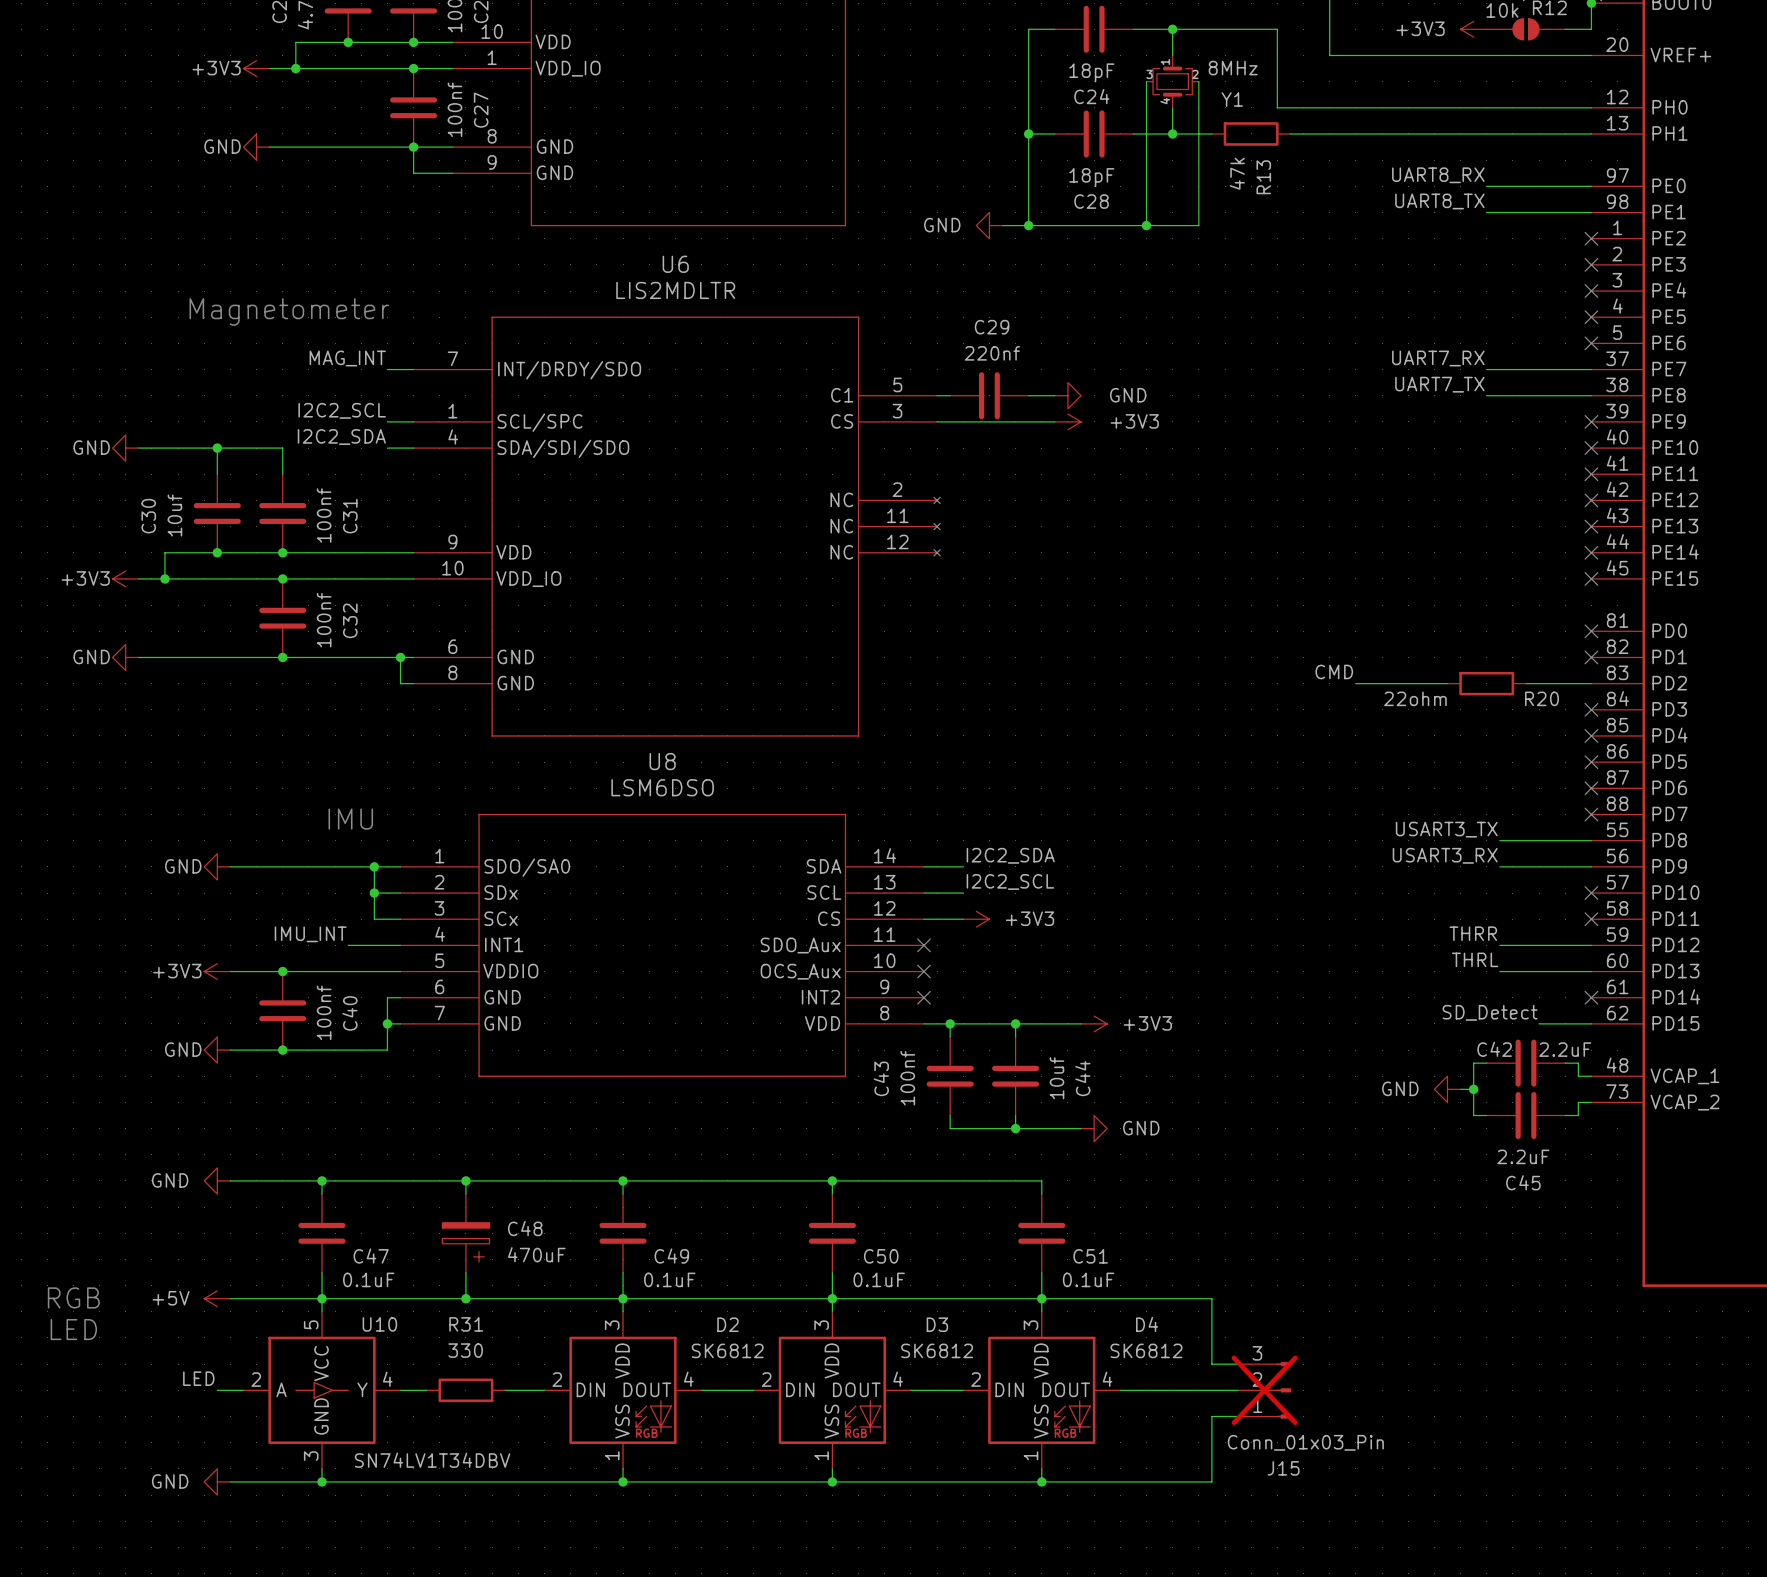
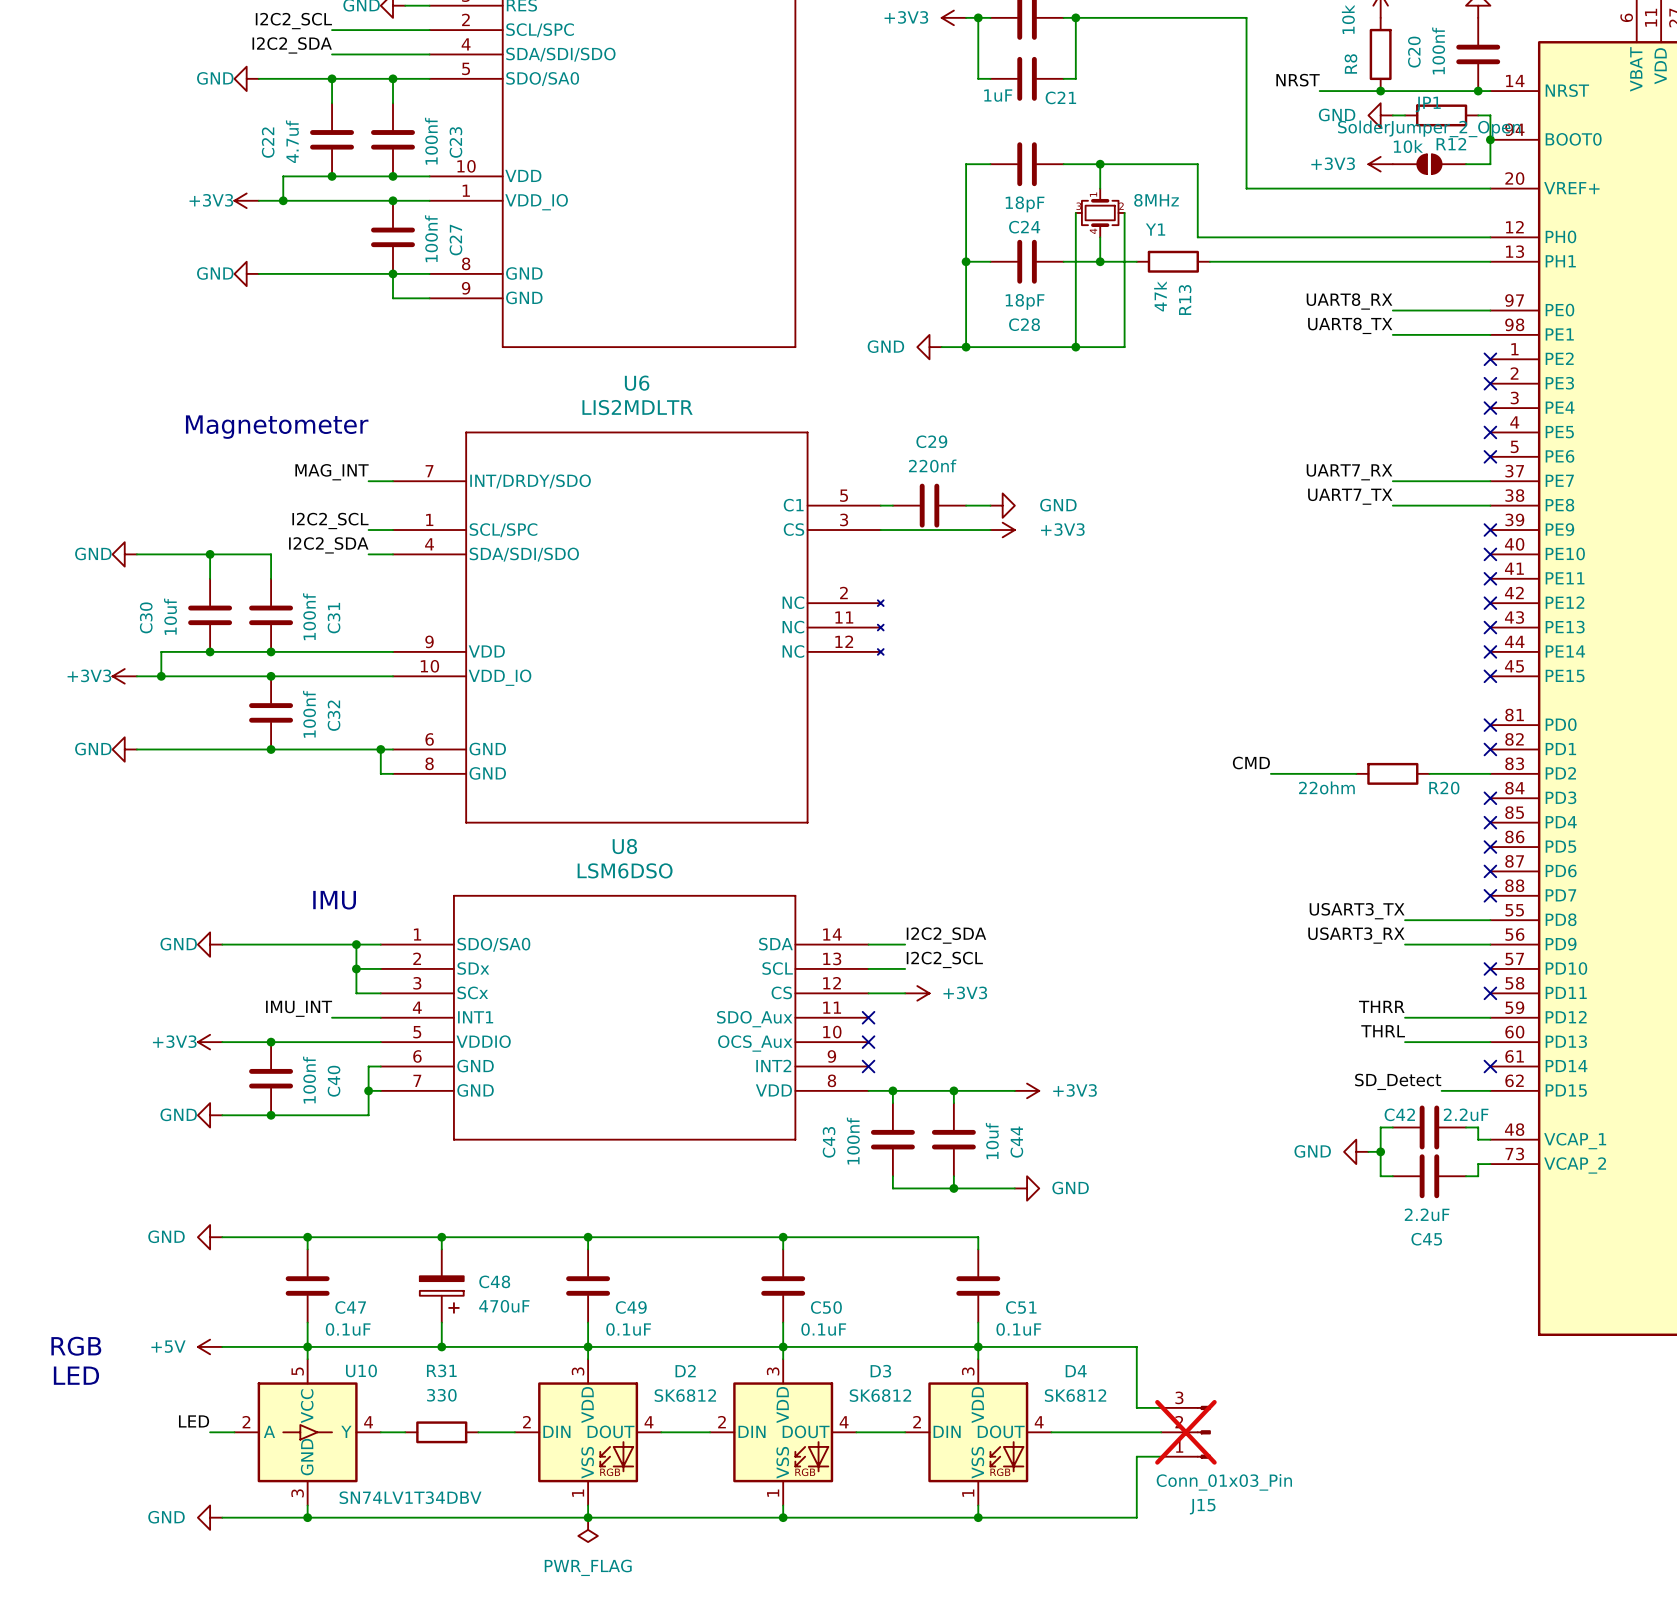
power symbol: none -> PWR_FLAG (588, 1529)

